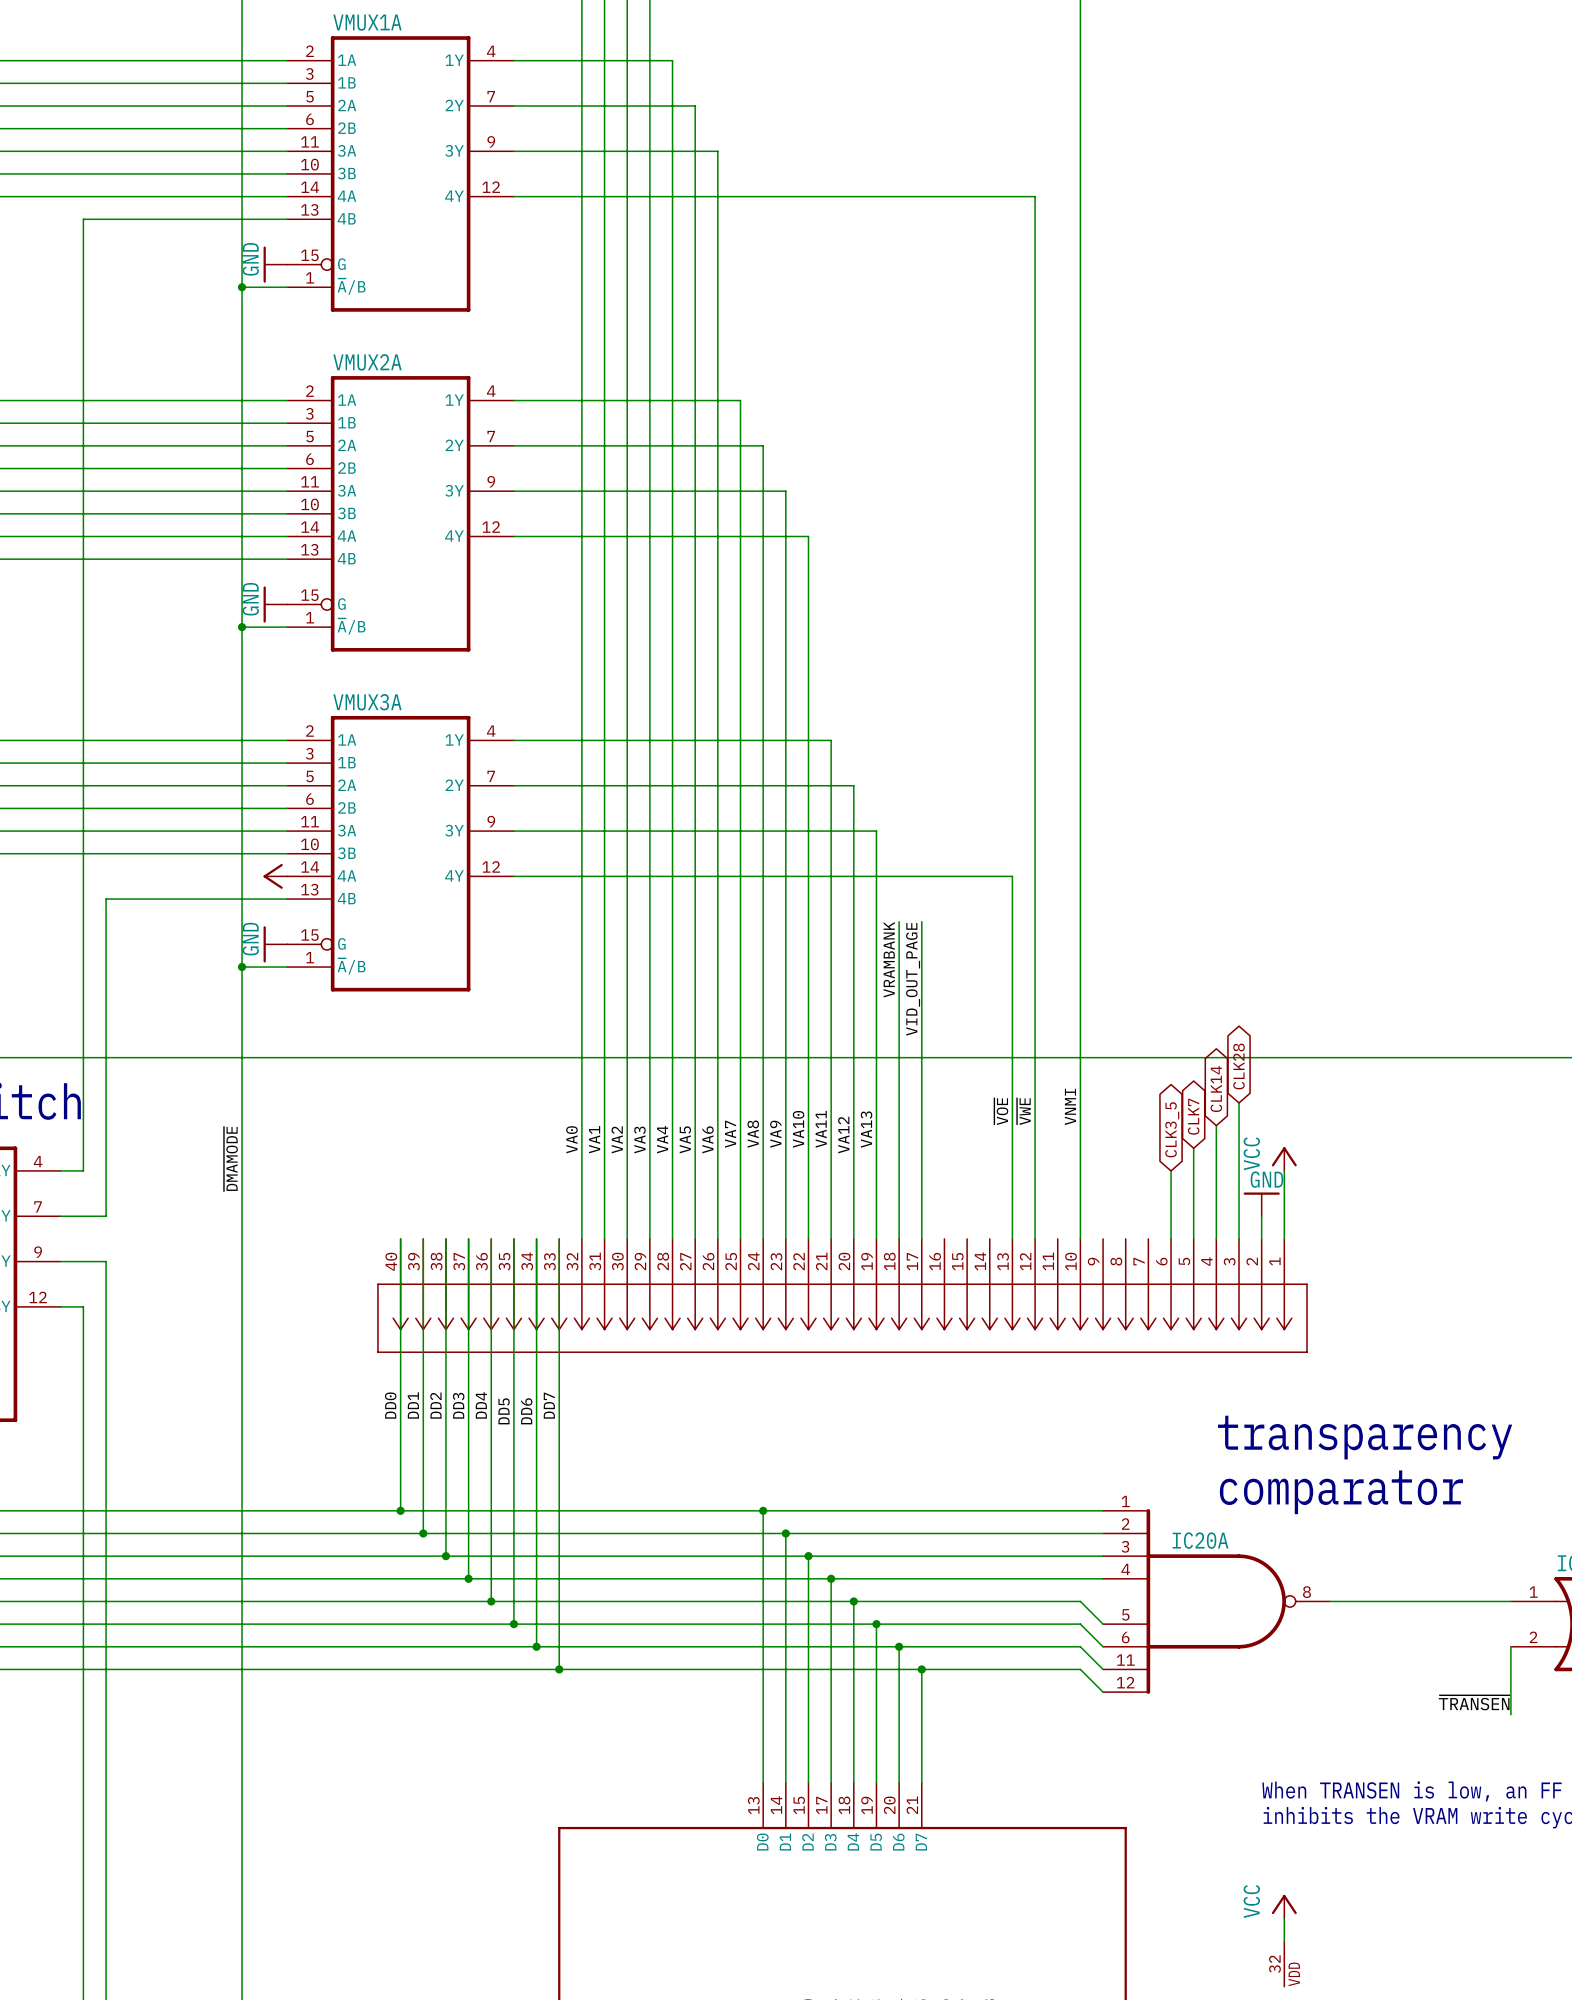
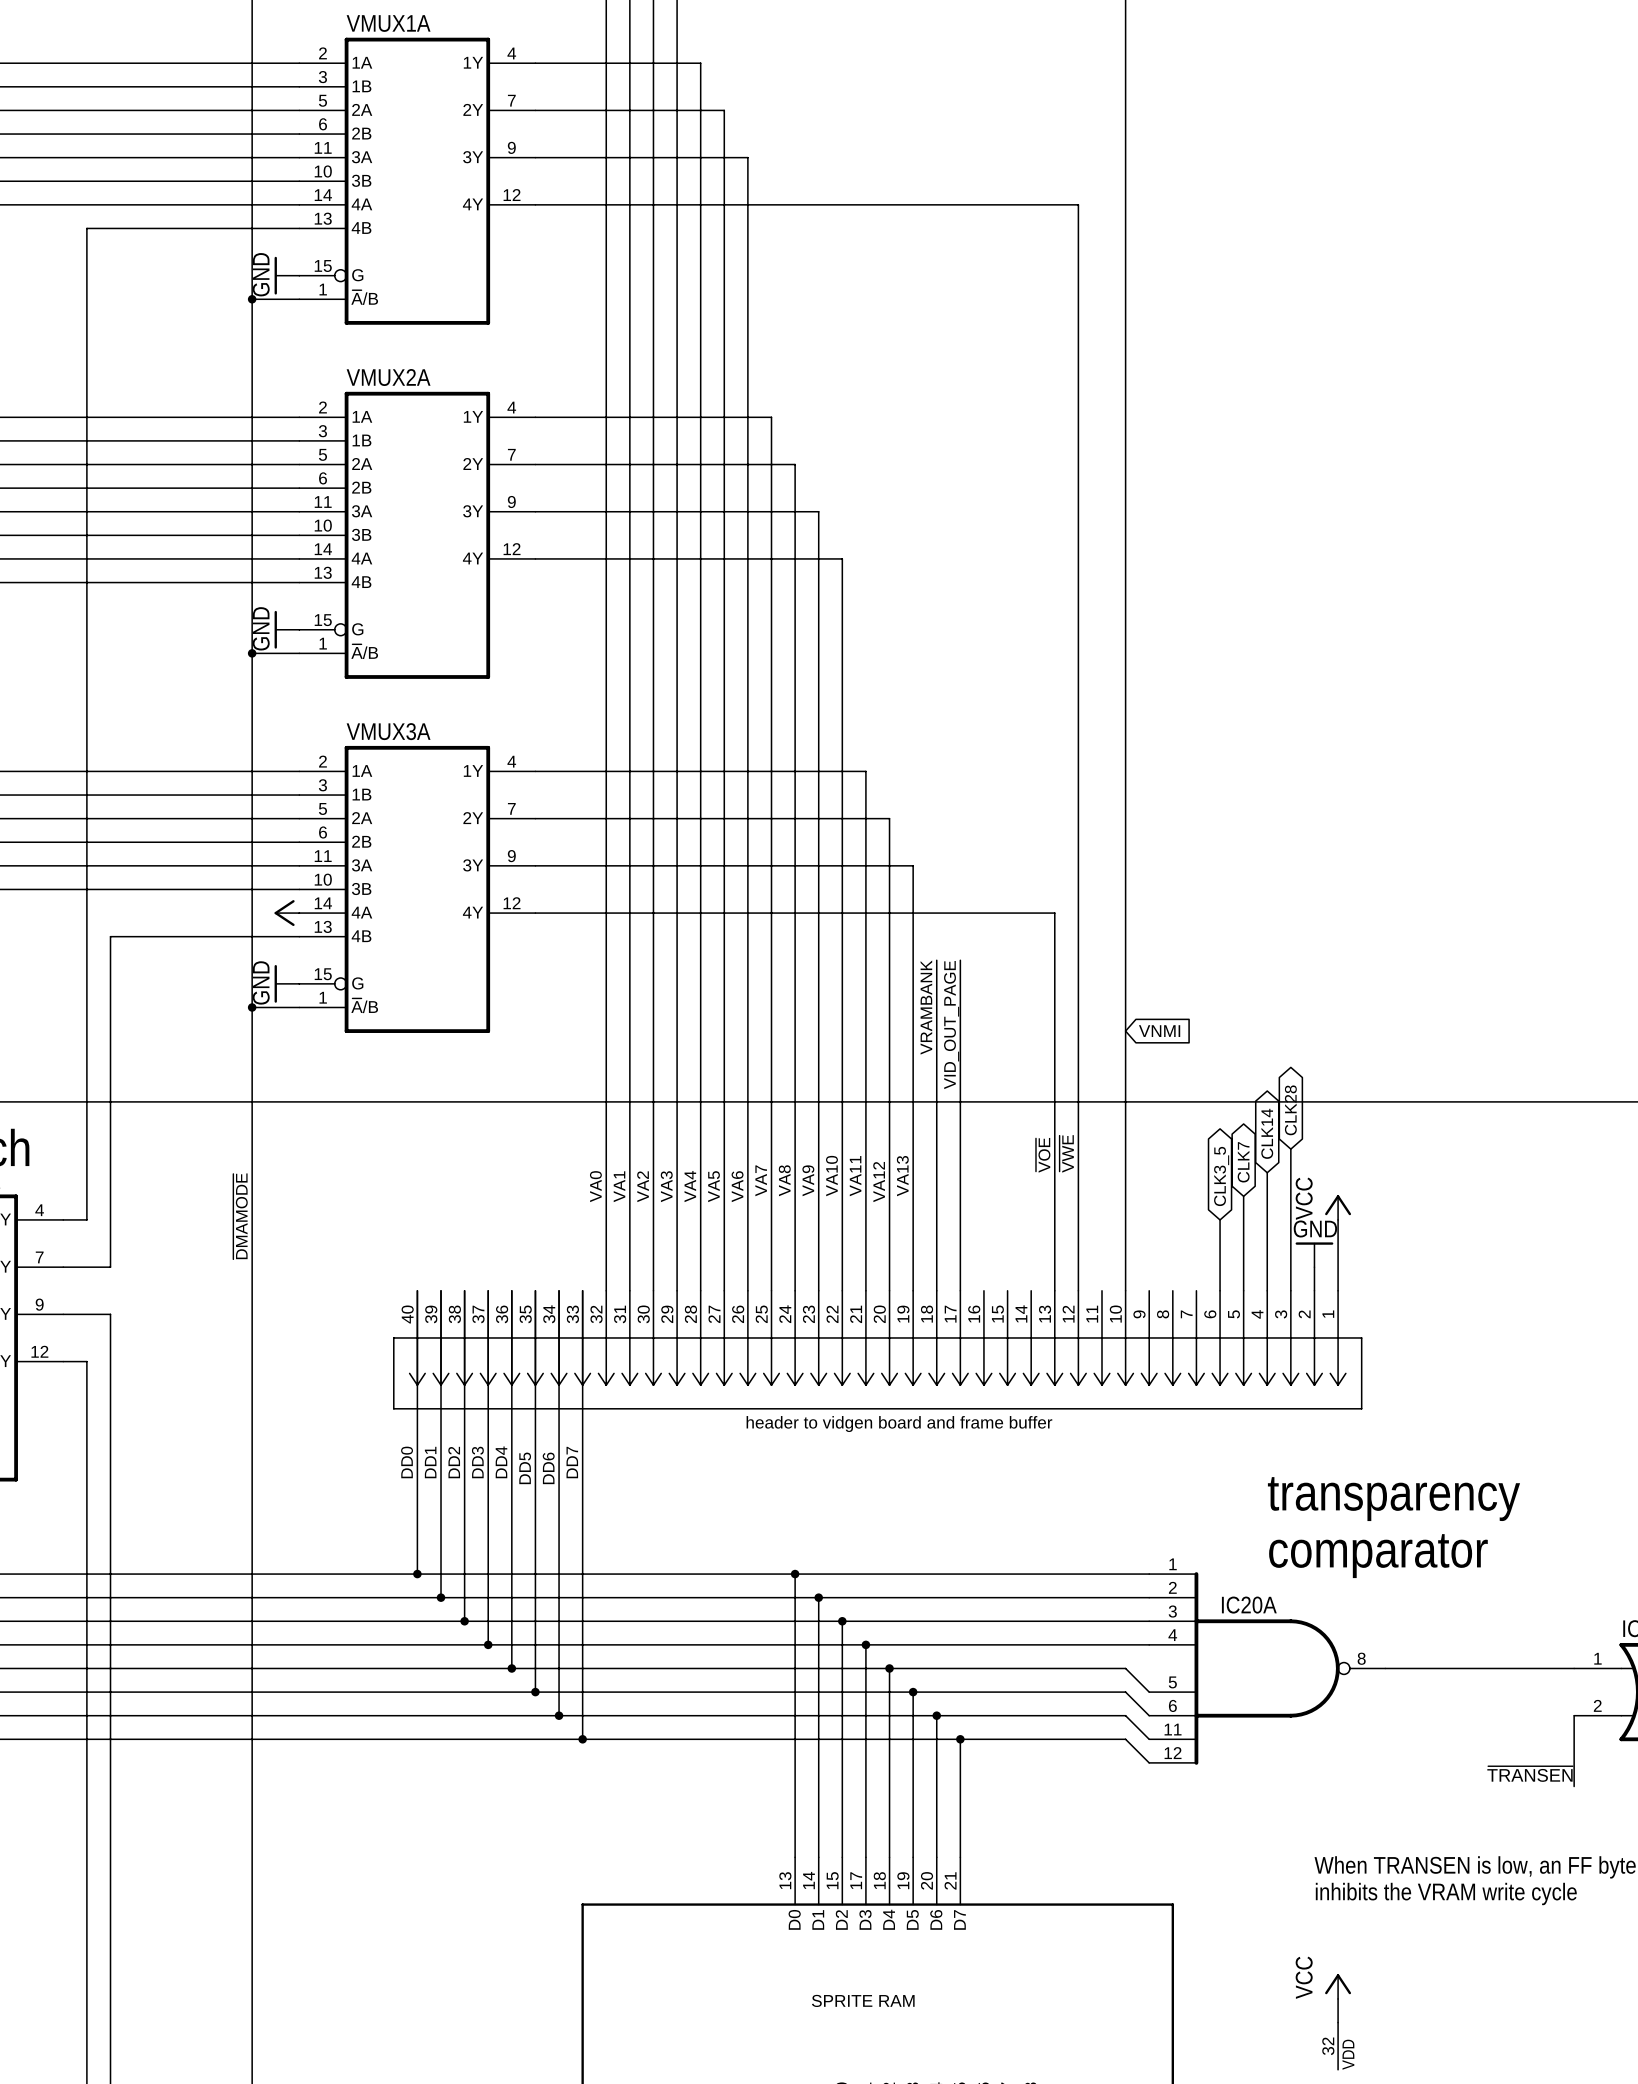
global label: none -> VNMI (1159, 1031)
label: VNMI (1070, 1106) -> none
text: none -> header to vidgen board and frame buffer (899, 1424)
text: none -> SPRITE RAM (863, 2000)

